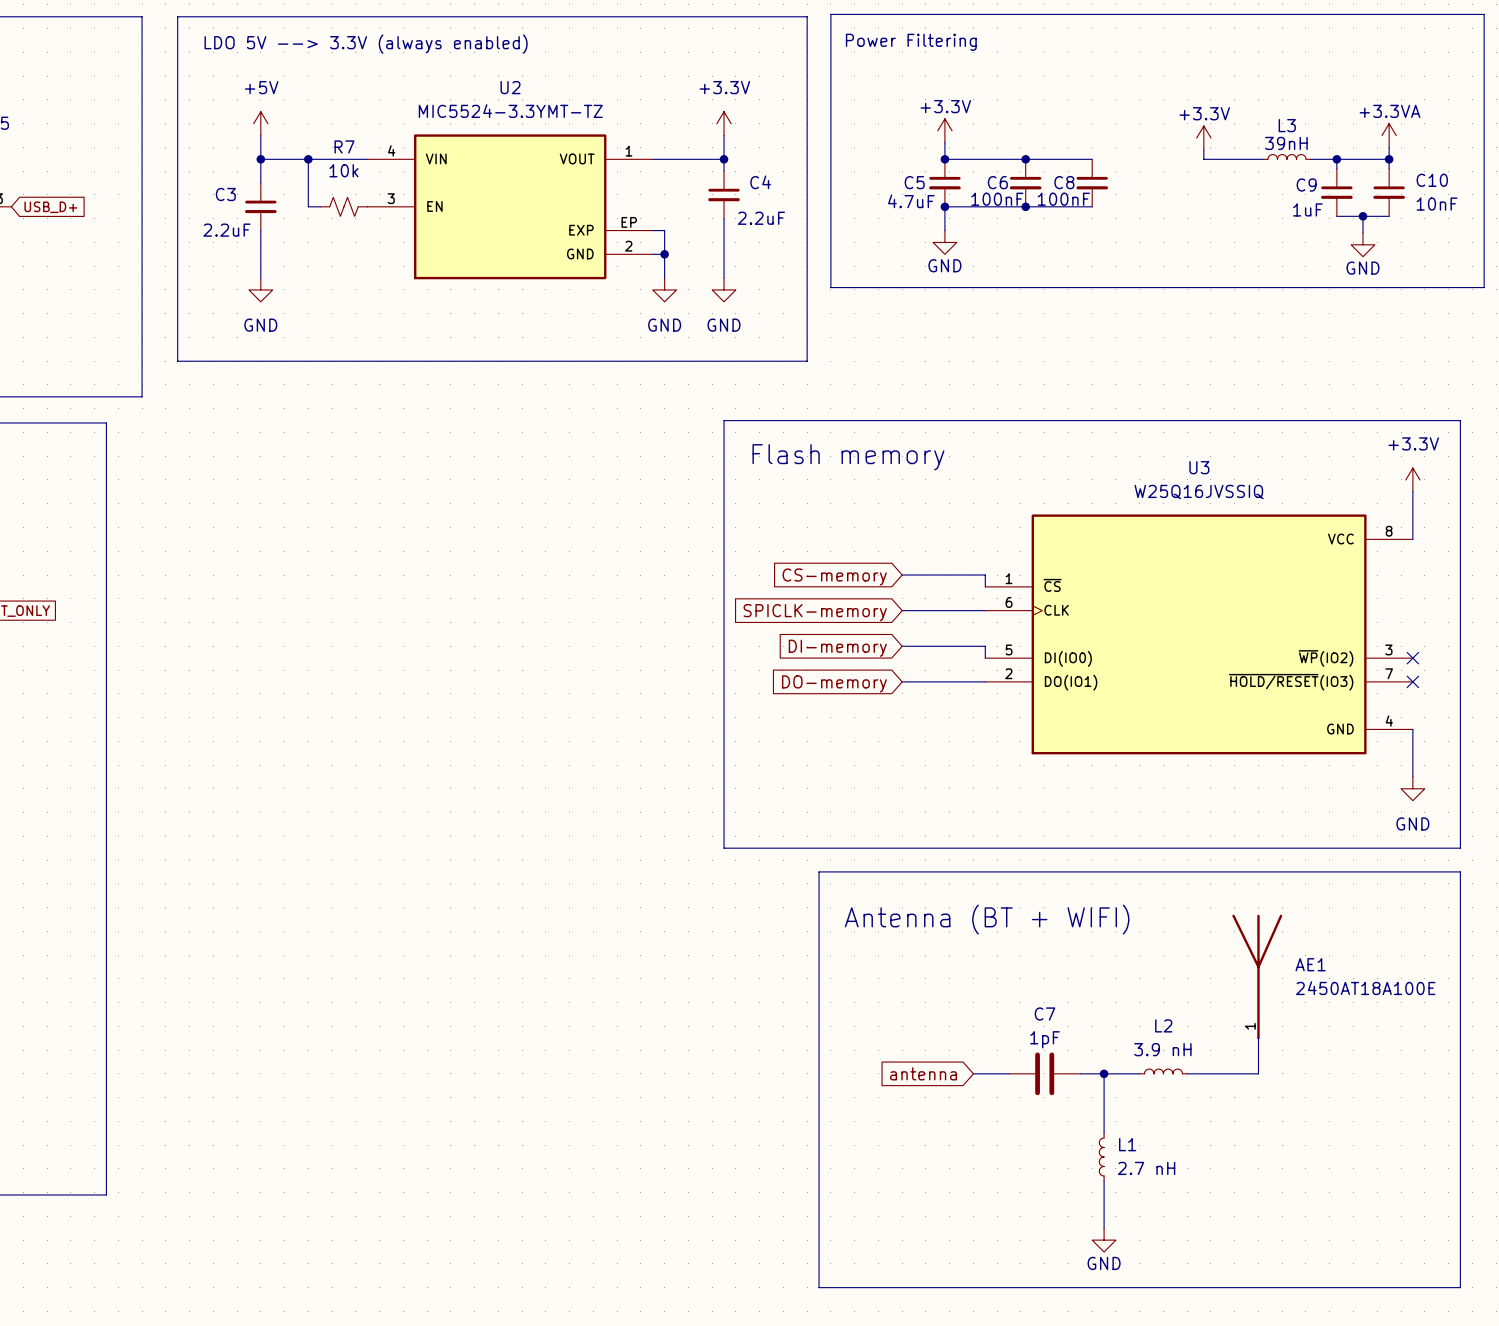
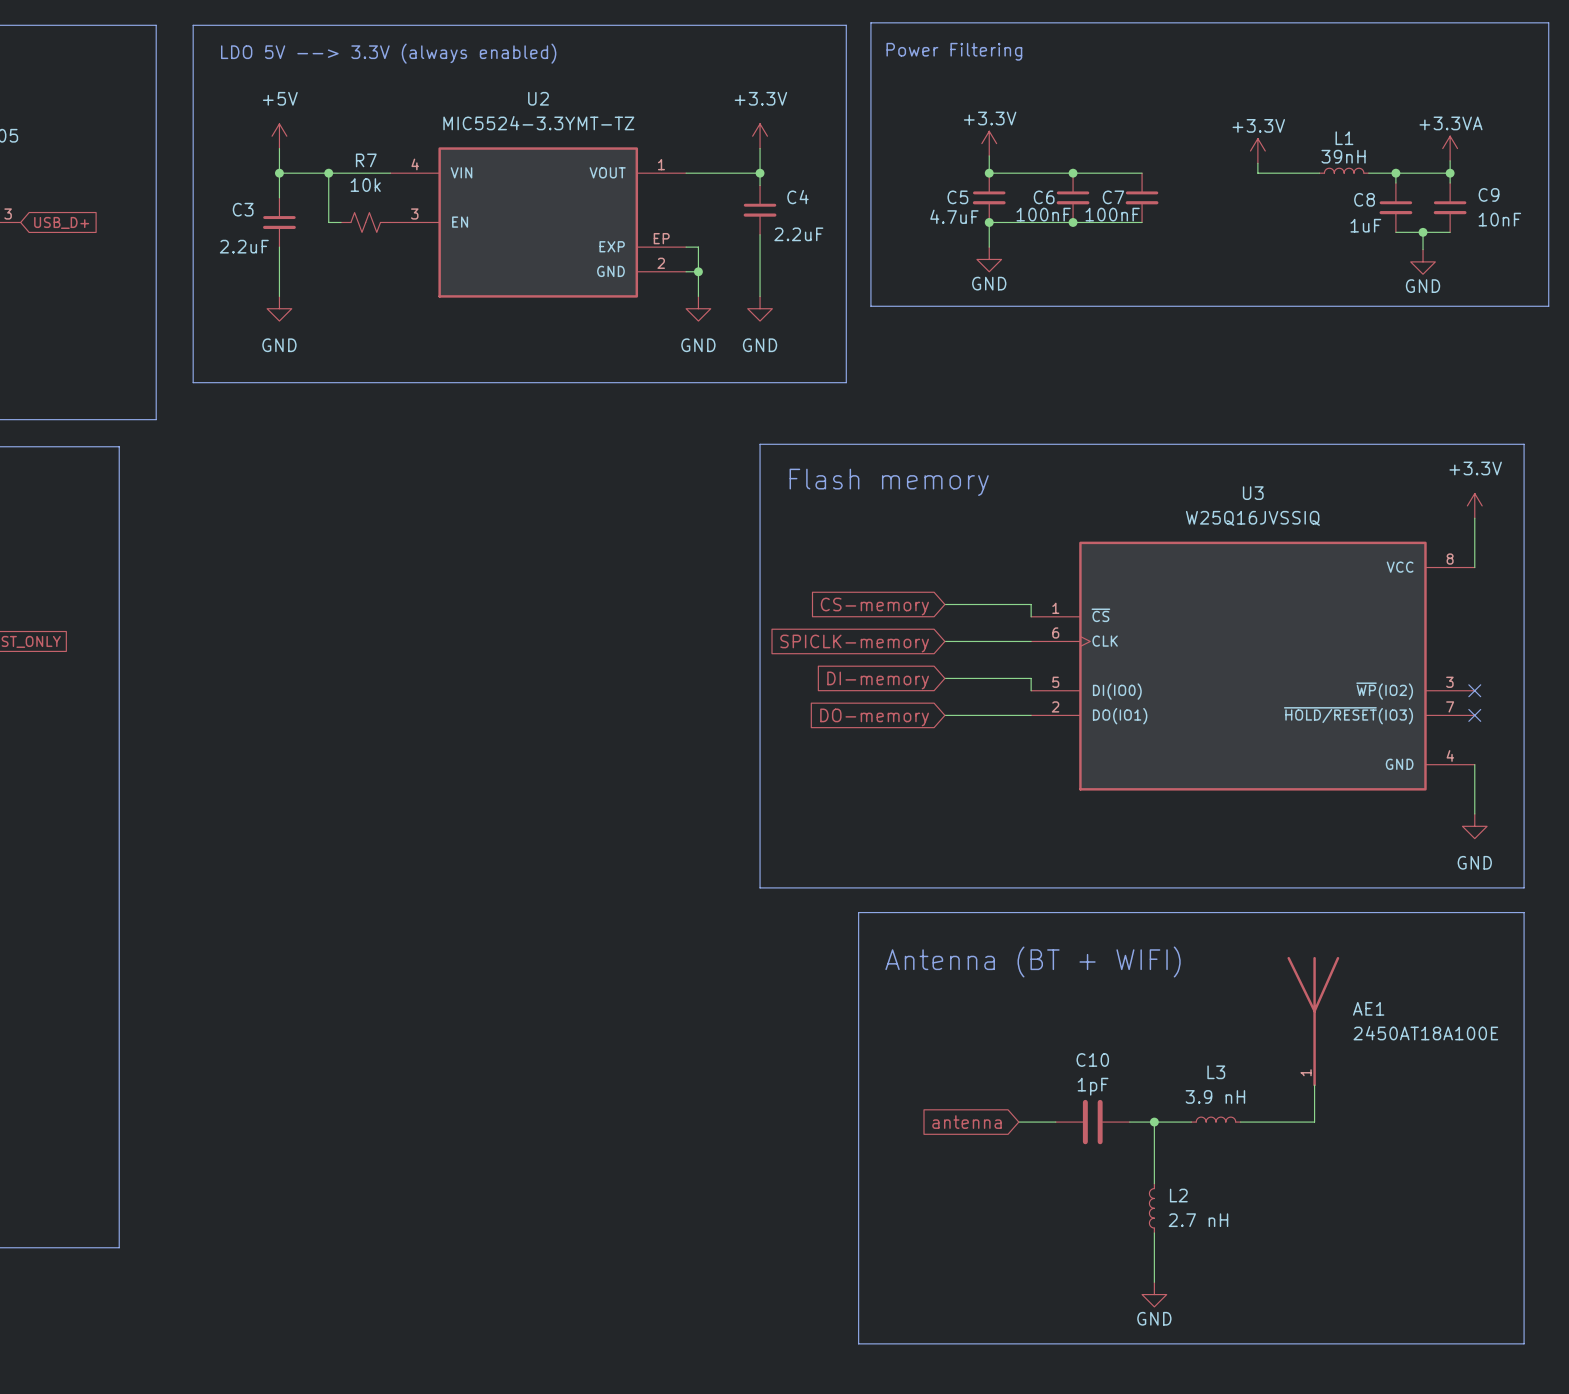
L3 name: L3 (1287, 125) -> L1 (1344, 138)
C10 name: C10 (1432, 180) -> C9 (1489, 194)
C8 name: C8 (1064, 182) -> C7 (1113, 197)
C9 name: C9 (1306, 185) -> C8 (1364, 199)
C7 name: C7 (1044, 1014) -> C10 (1092, 1059)
L2 name: L2 (1163, 1025) -> L3 (1216, 1072)
L1 name: L1 (1127, 1144) -> L2 (1178, 1195)

